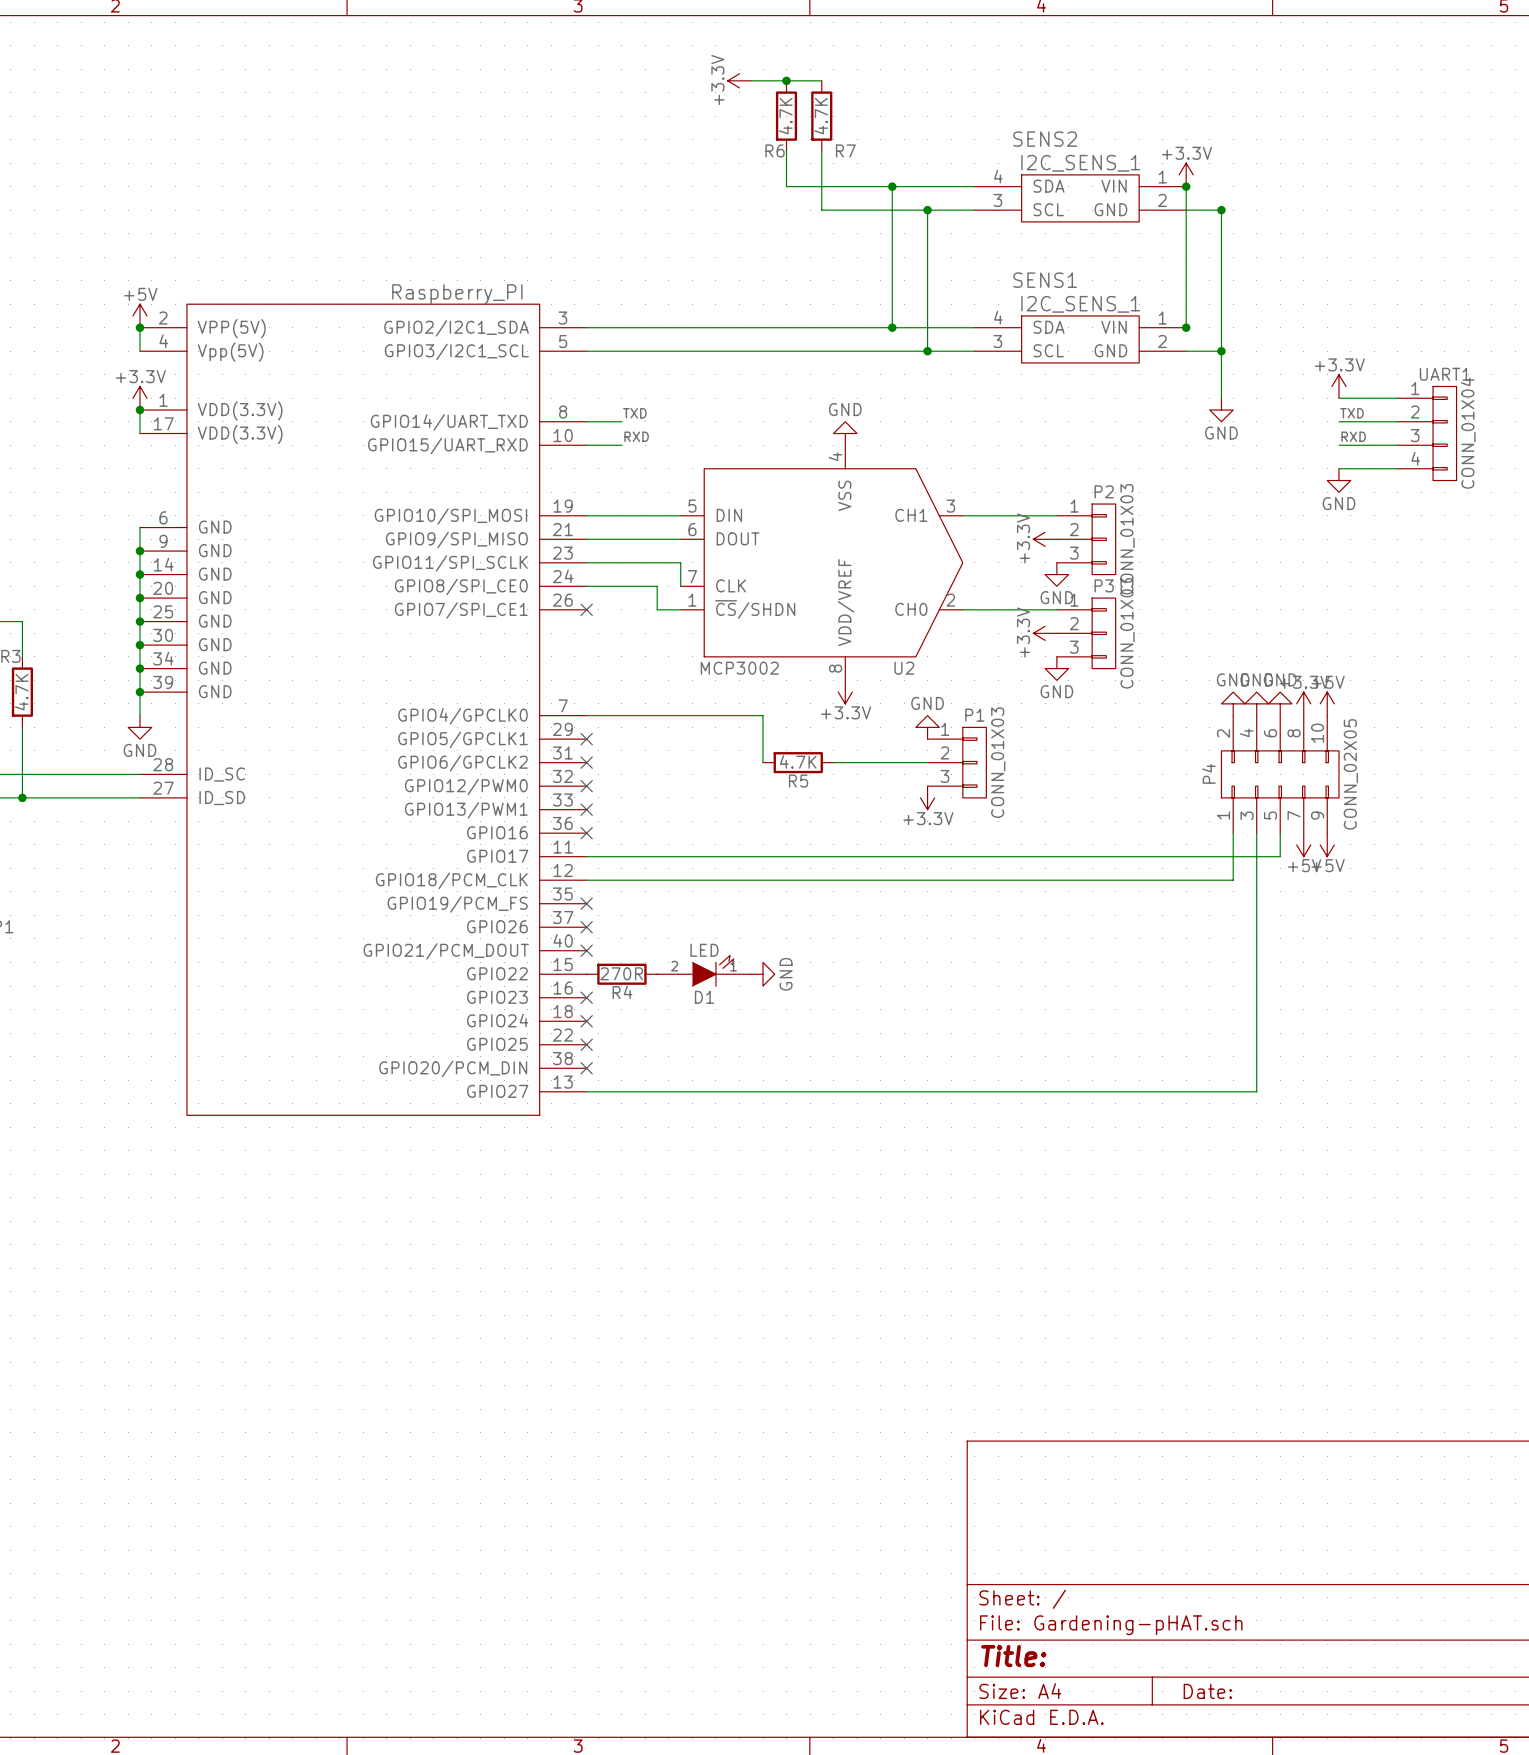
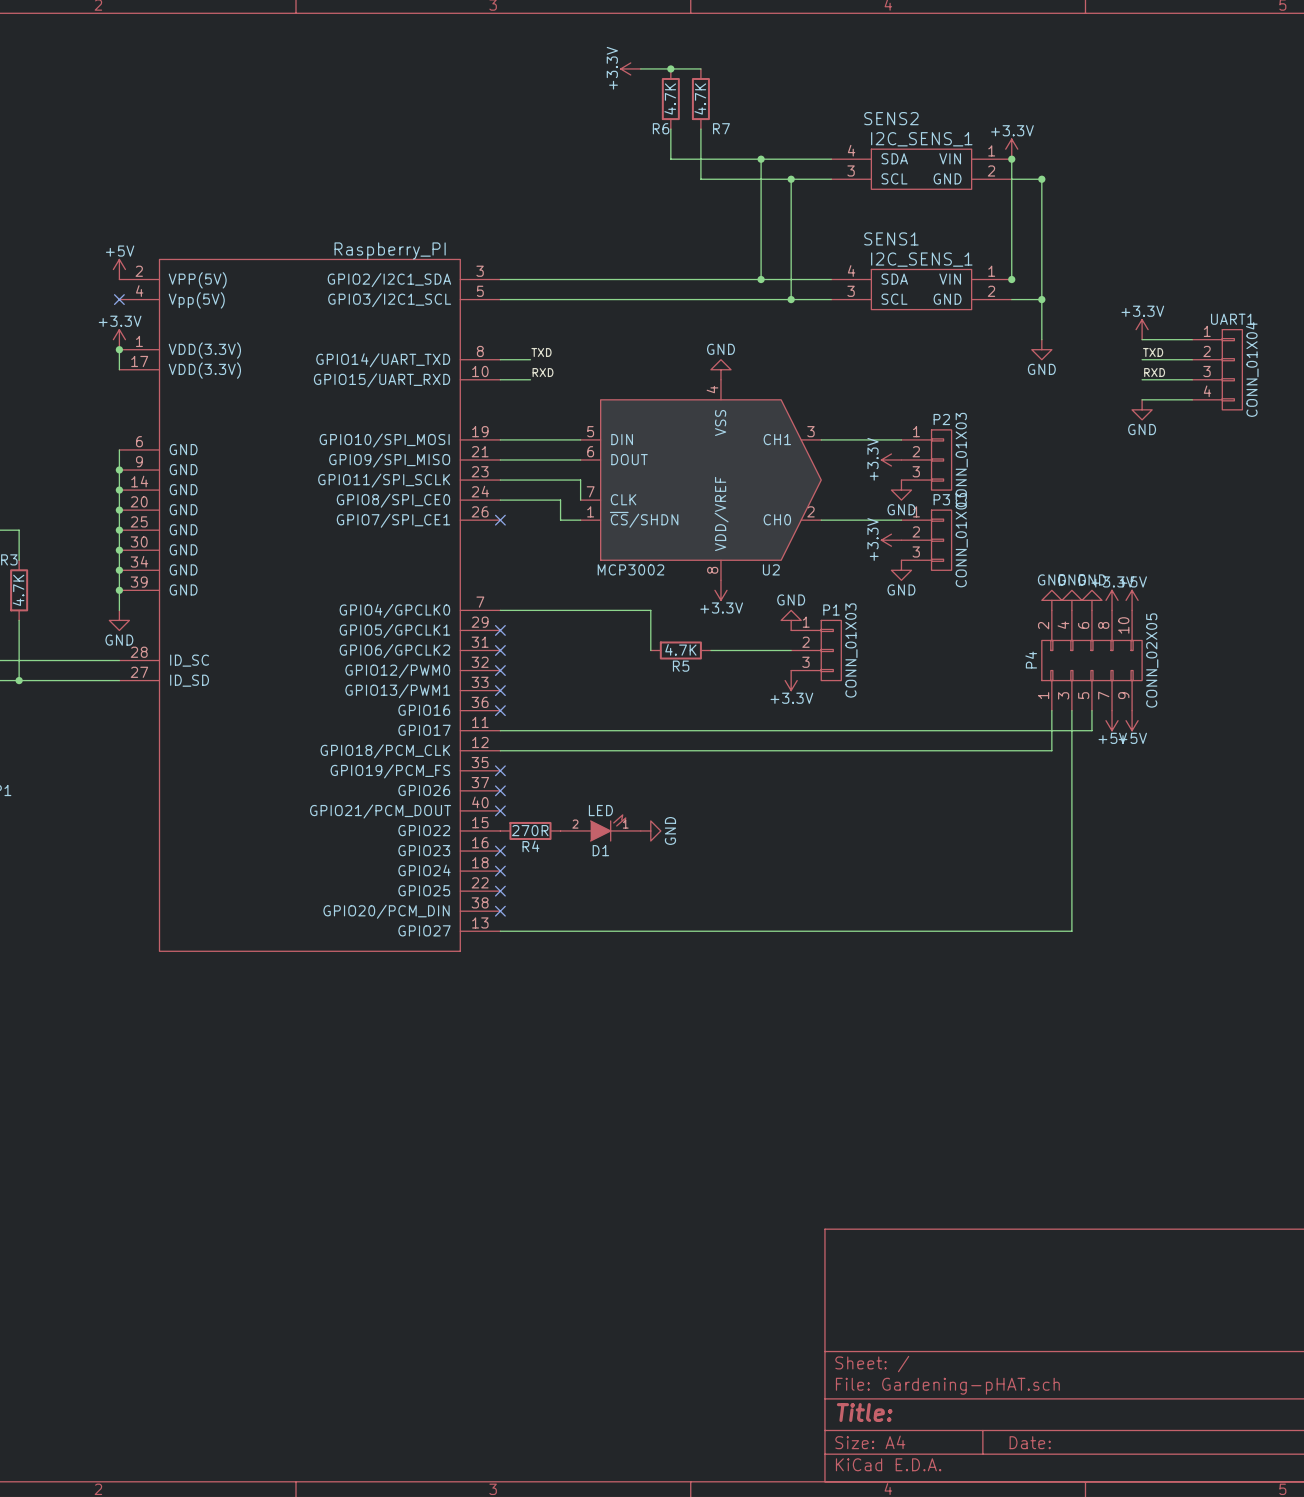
wire: (139, 327) (139, 351) -> none
junction: (139, 327) -> none
no-connect mark: none -> (119, 299)

